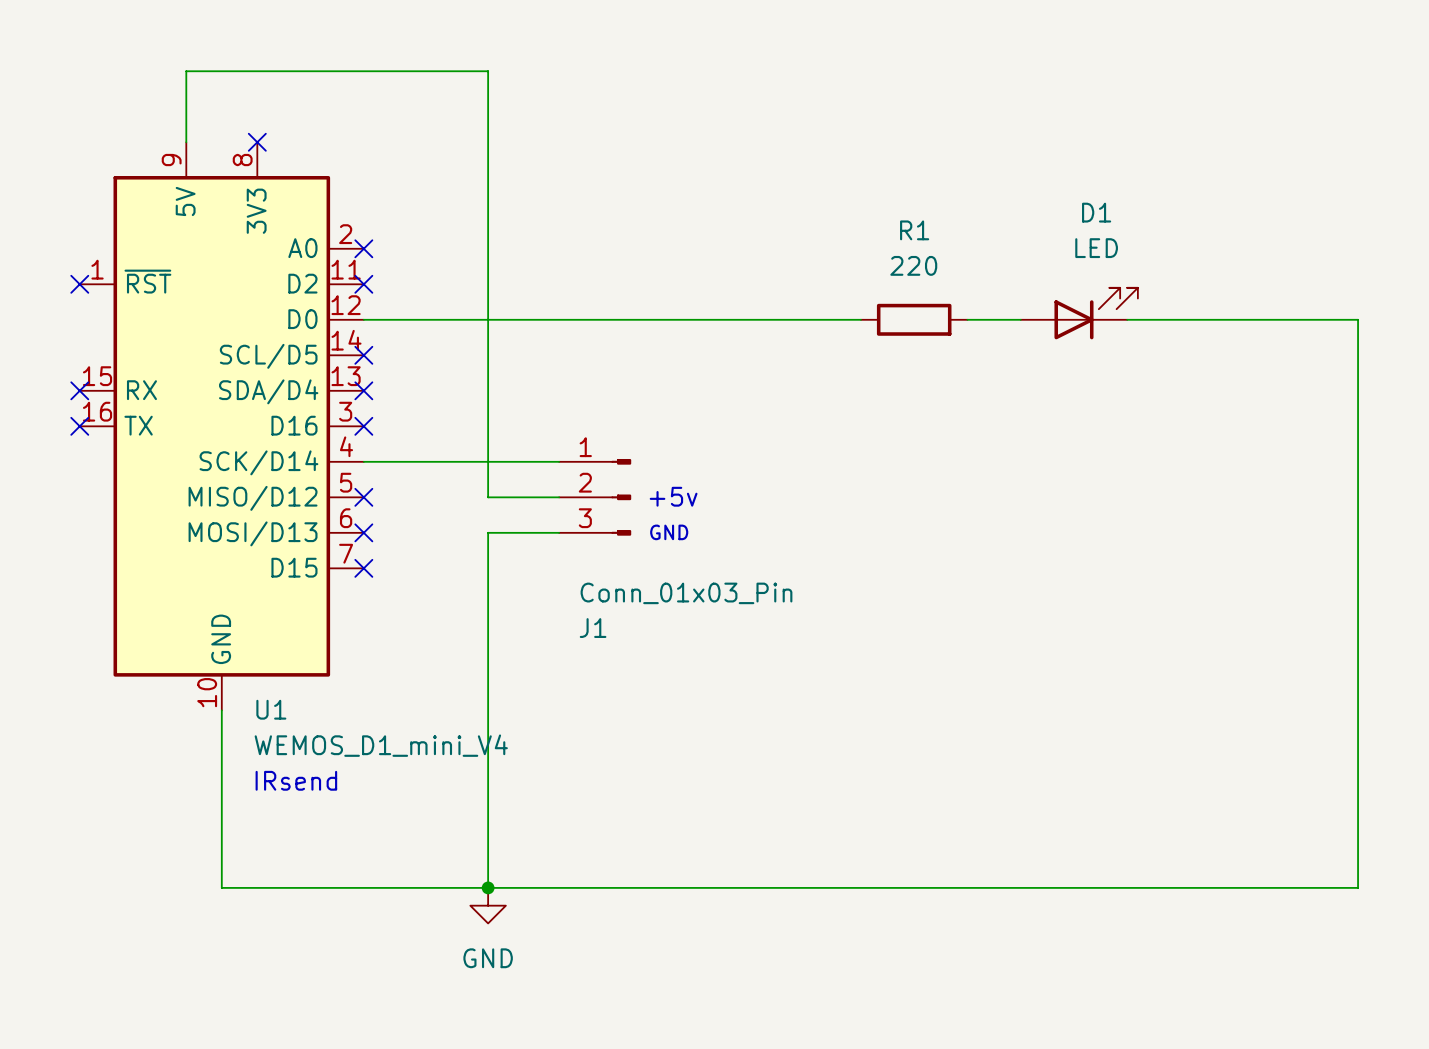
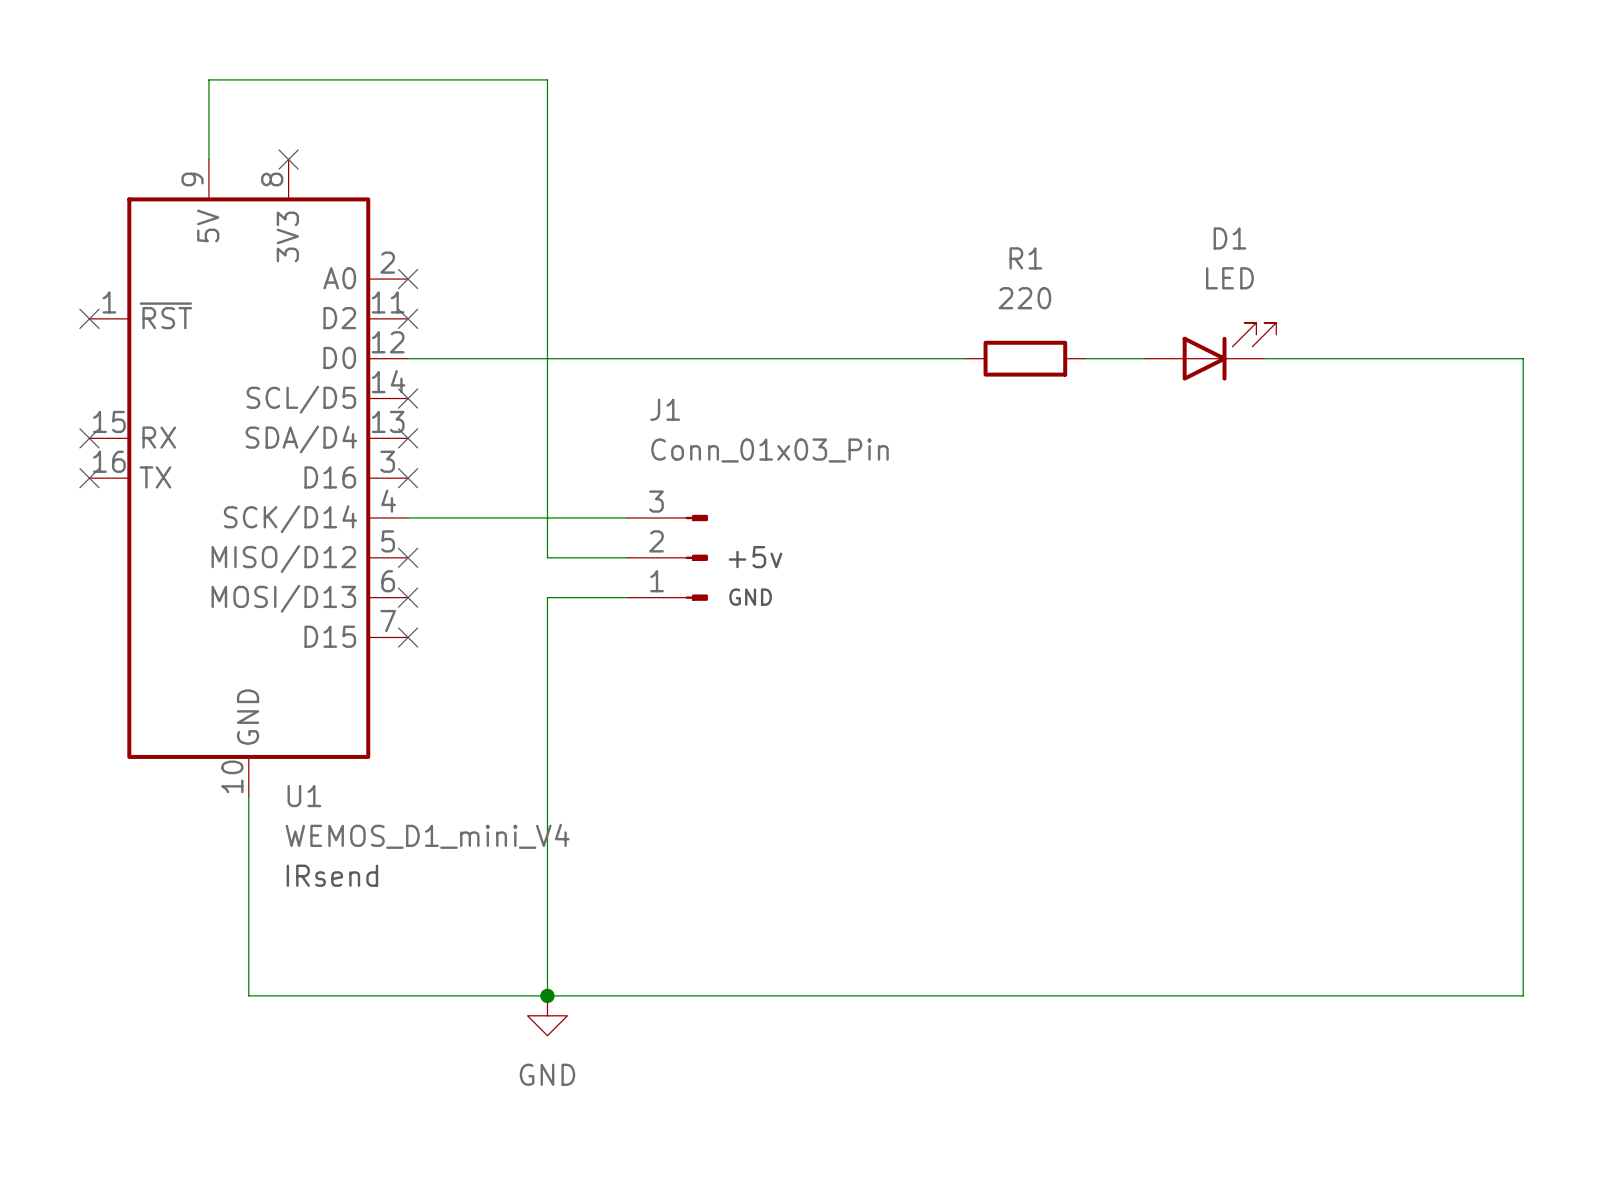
J1 flip: as is (621, 497) -> up-down (696, 557)

